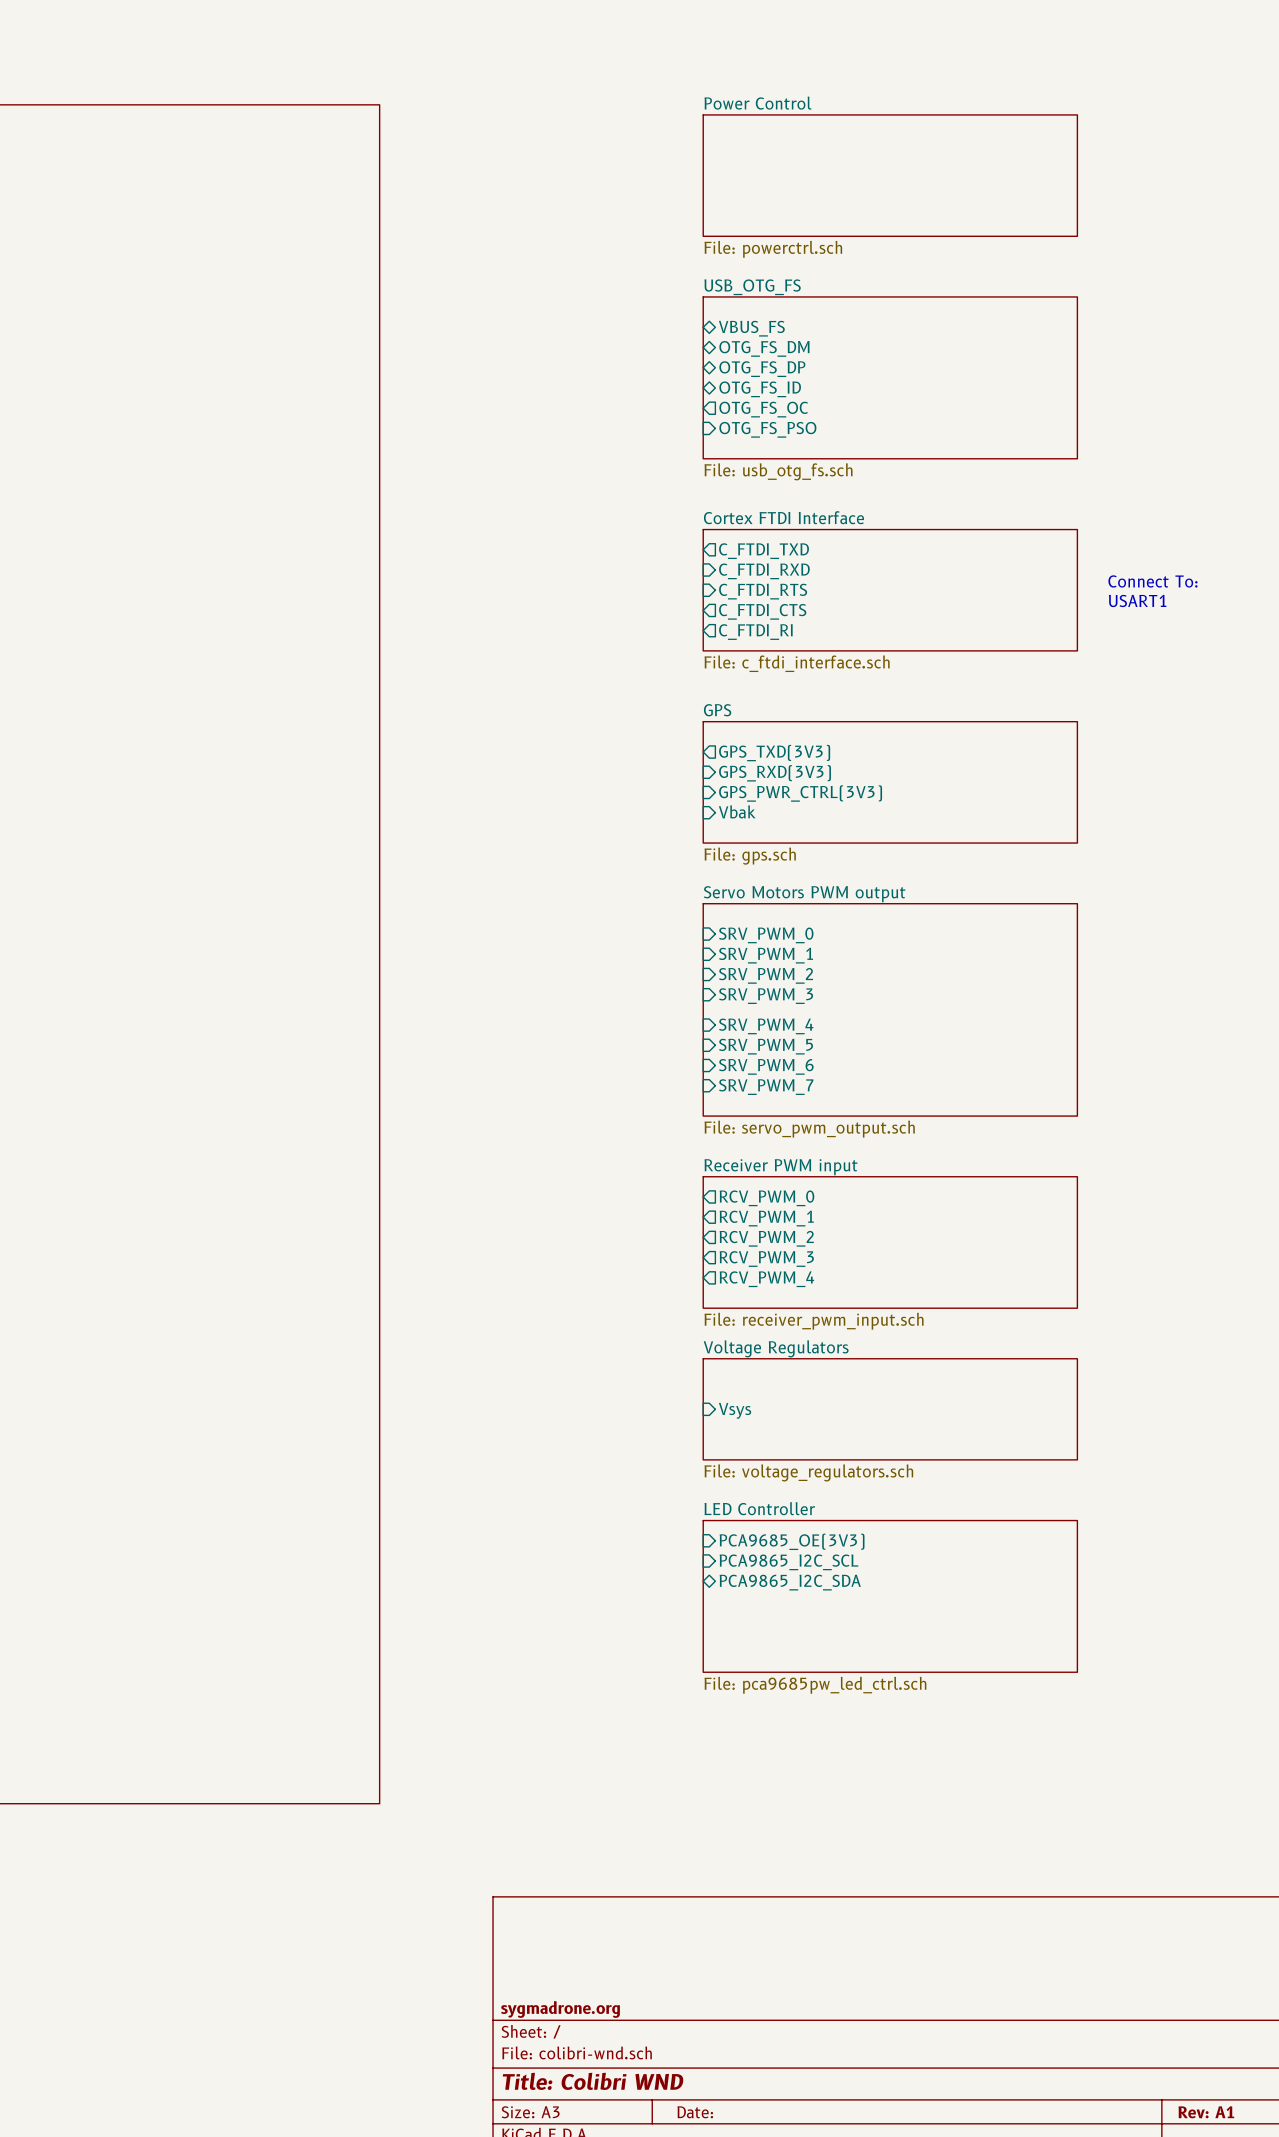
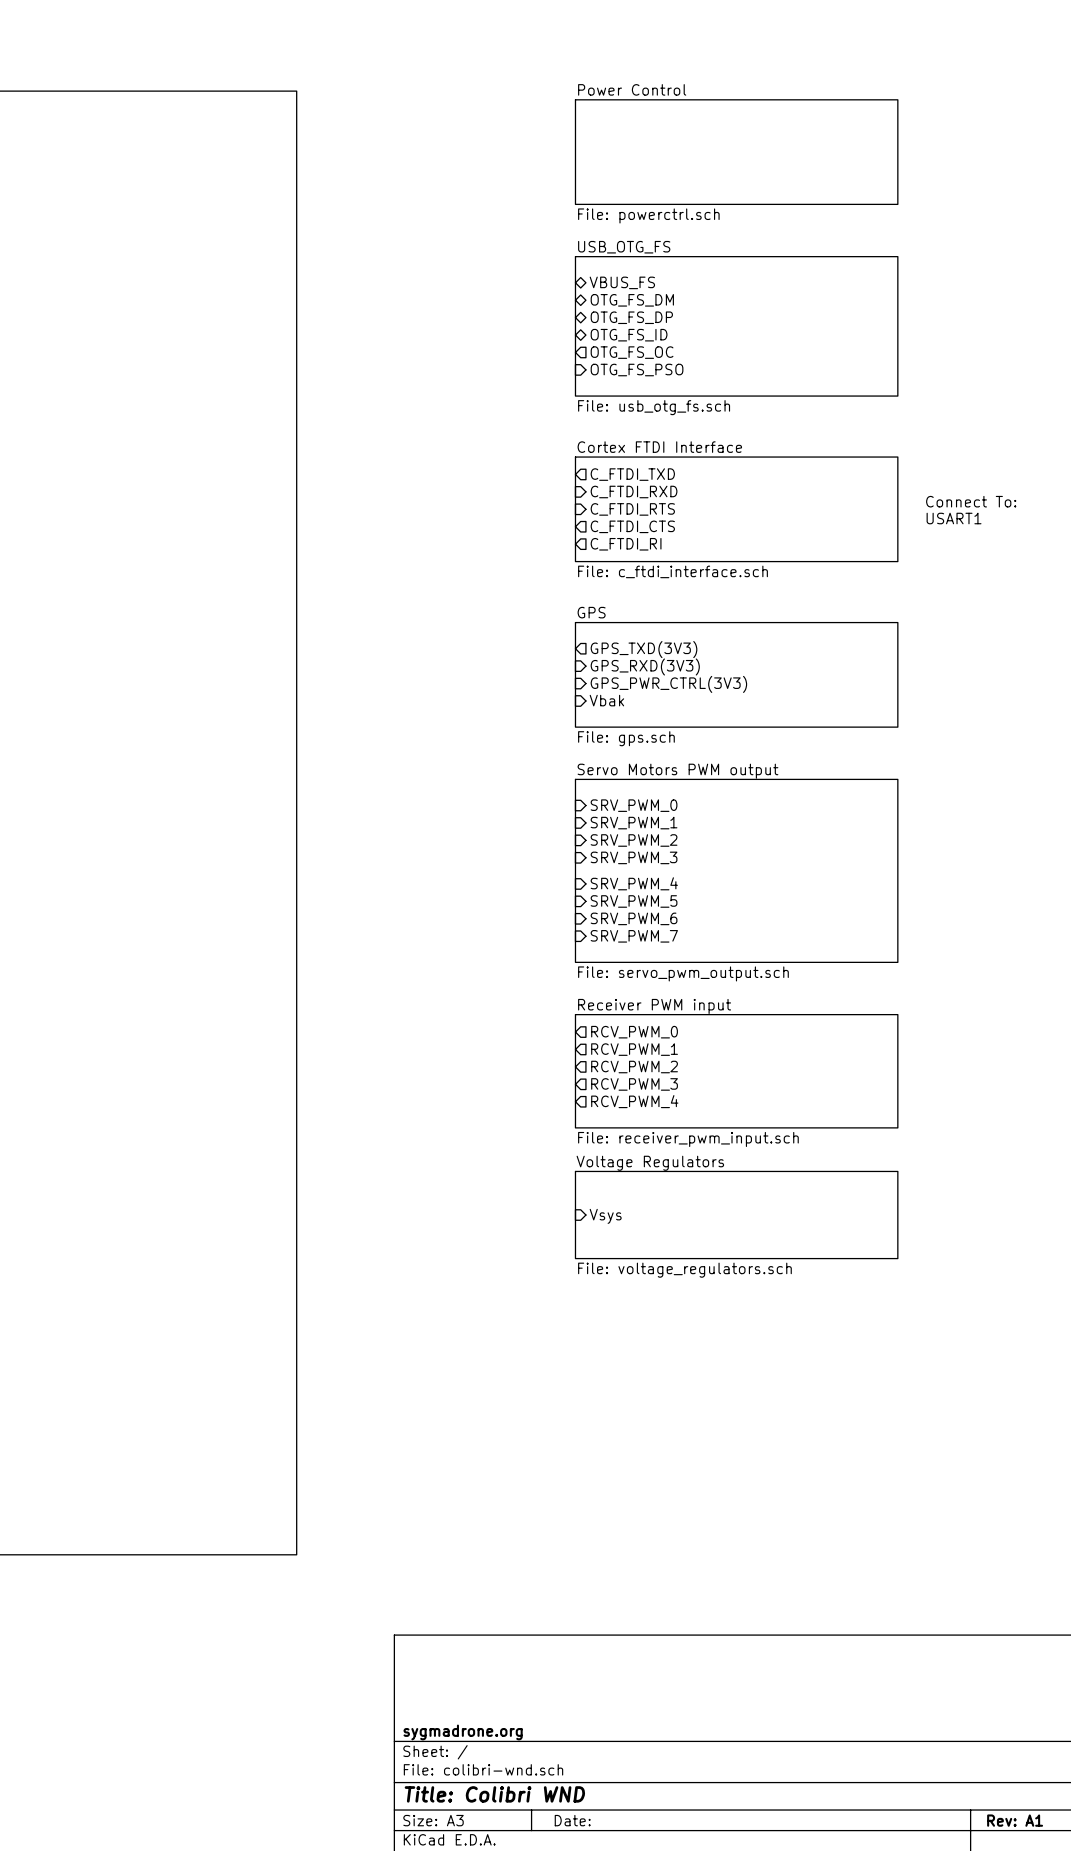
sheet pin: PCA9685_OE(3V3) (792, 1541) -> none
sheet pin: PCA9865_I2C_SCL (789, 1562) -> none
sheet pin: PCA9865_I2C_SDA (790, 1582) -> none
sheet LED Controller: File: pca9685pw_led_ctrl.sch (890, 1596) -> none

